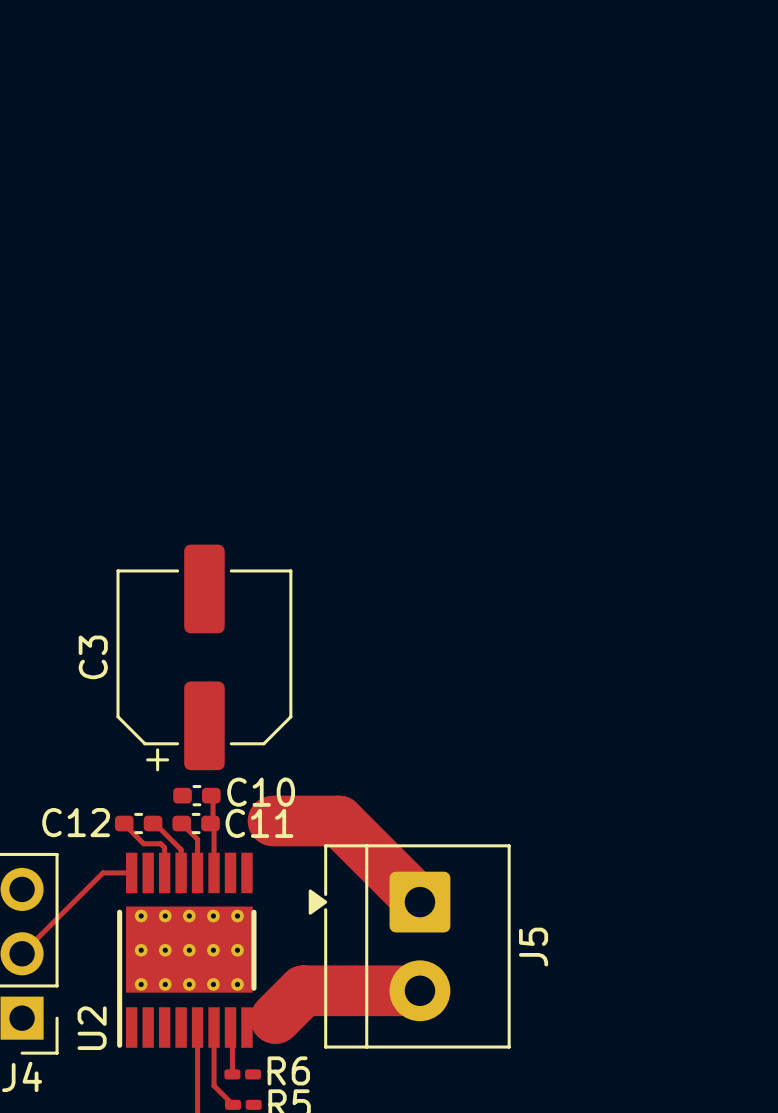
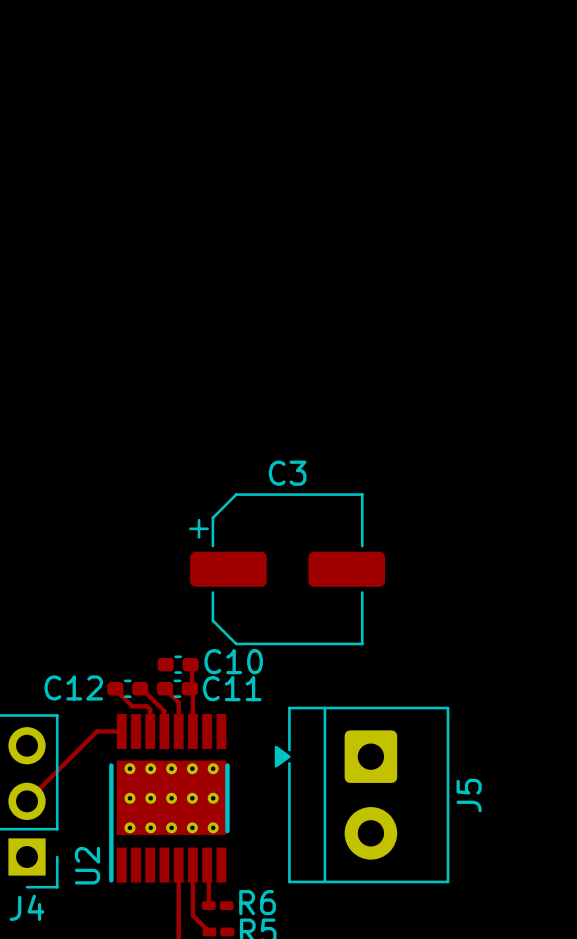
C3 footprint: [116, 544, 293, 772] -> [189, 493, 386, 646]
C3 name position: C3 (93, 657) -> C3 (287, 473)
top track: (272, 820) (338, 820) (419, 902) -> none
top track: (419, 990) (303, 990) (275, 1018) -> none

